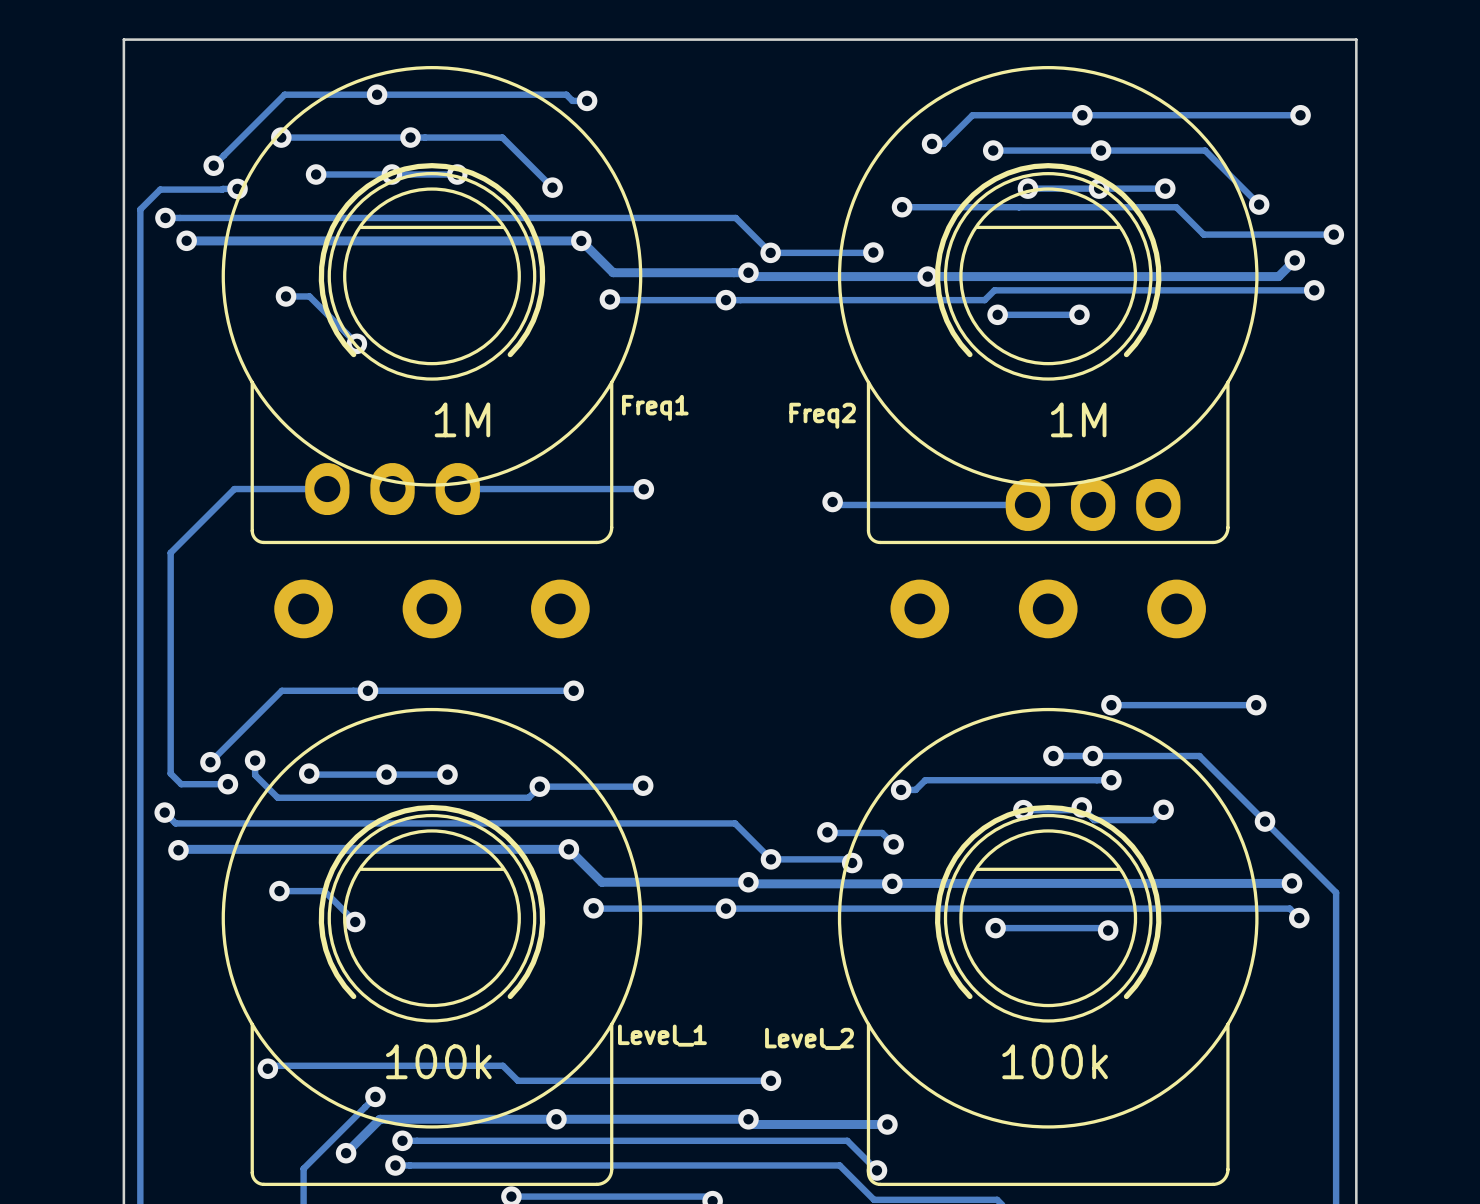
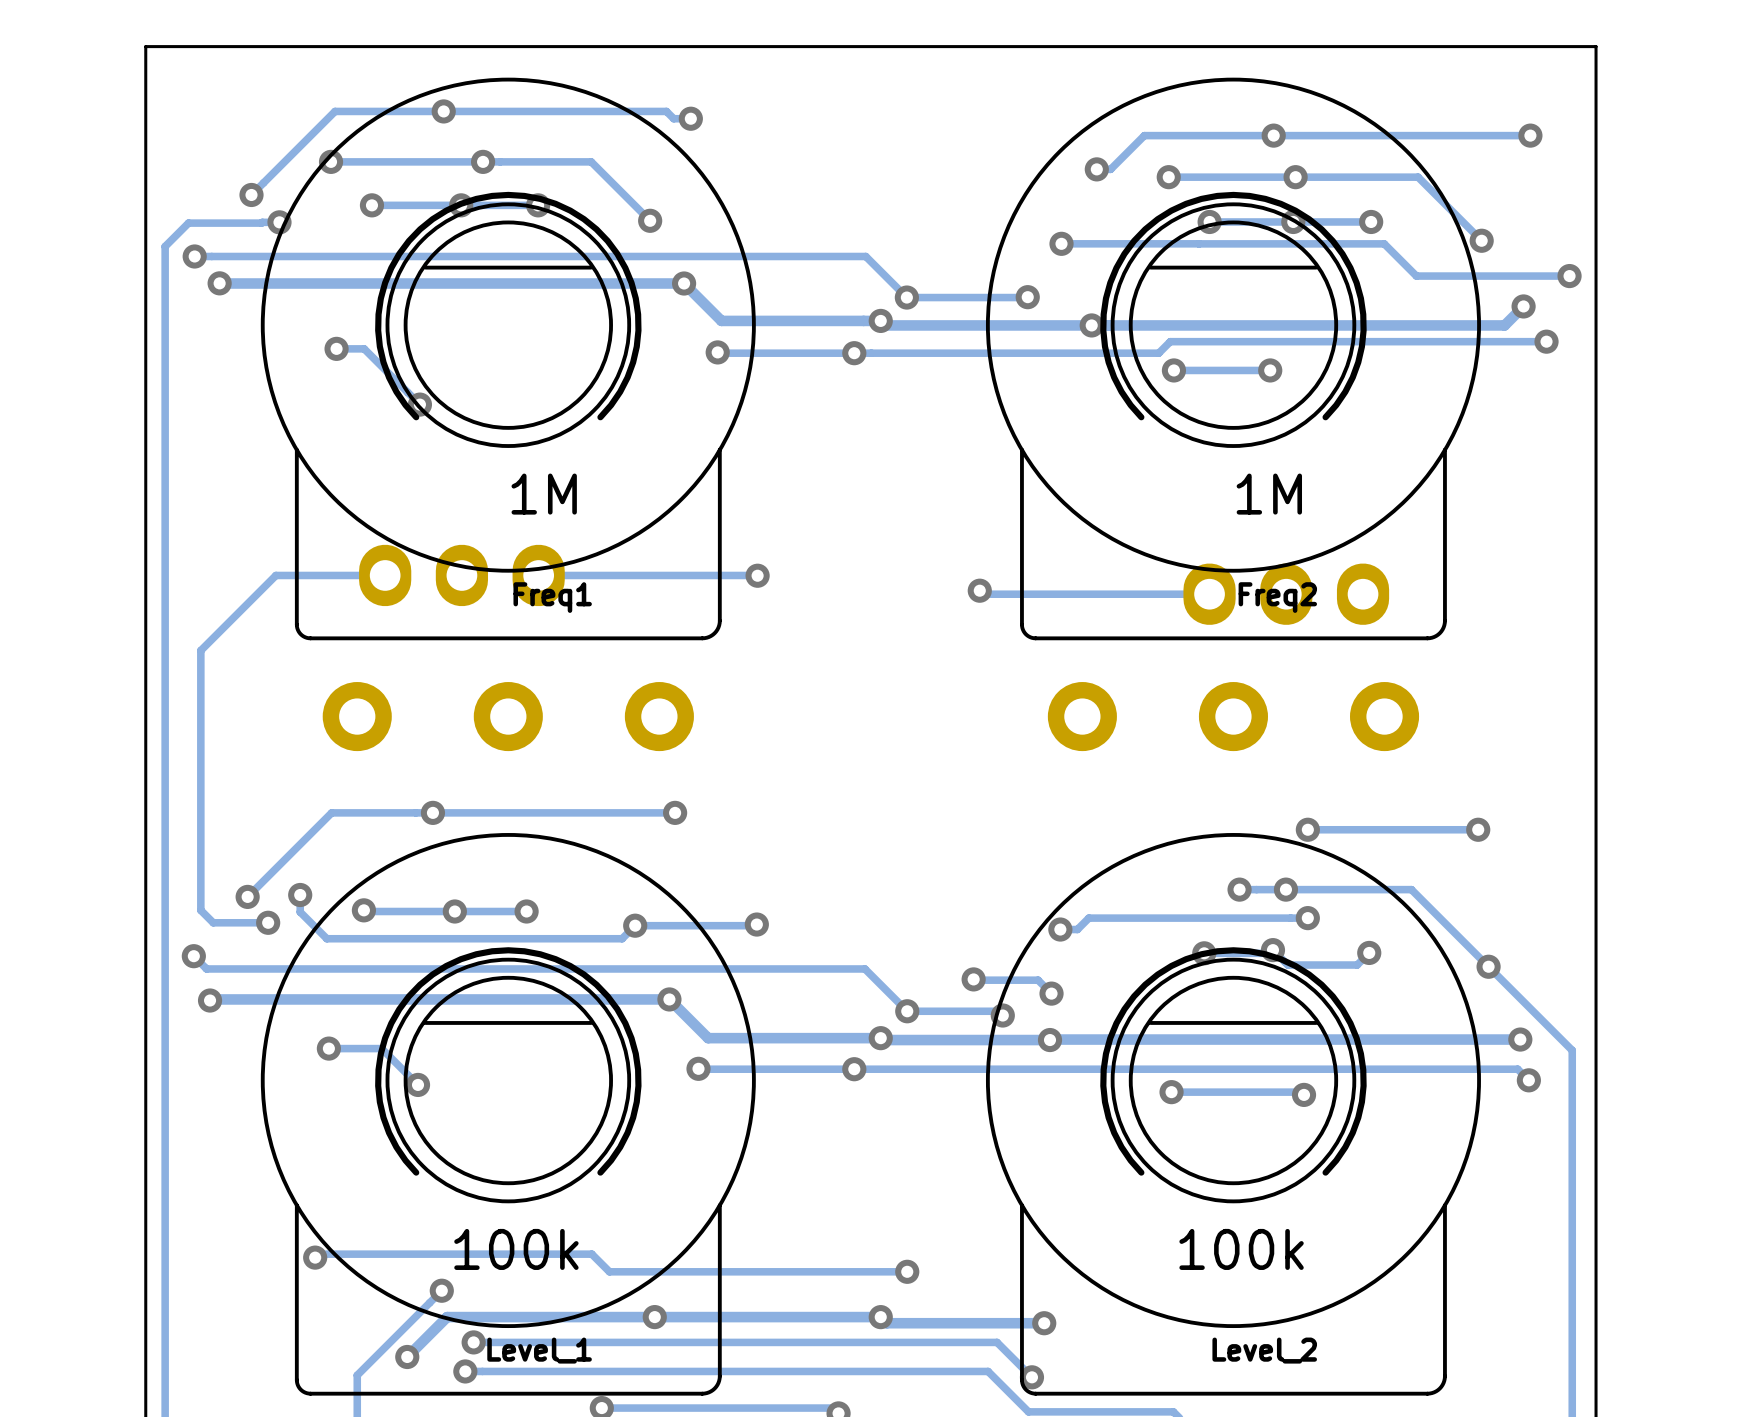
Freq1 name position: Freq1 (655, 407) -> Freq1 (552, 597)
Freq2 name position: Freq2 (822, 415) -> Freq2 (1277, 597)
Level_1 name position: Level_1 (662, 1035) -> Level_1 (539, 1350)
Level_2 name position: Level_2 (809, 1038) -> Level_2 (1264, 1350)

